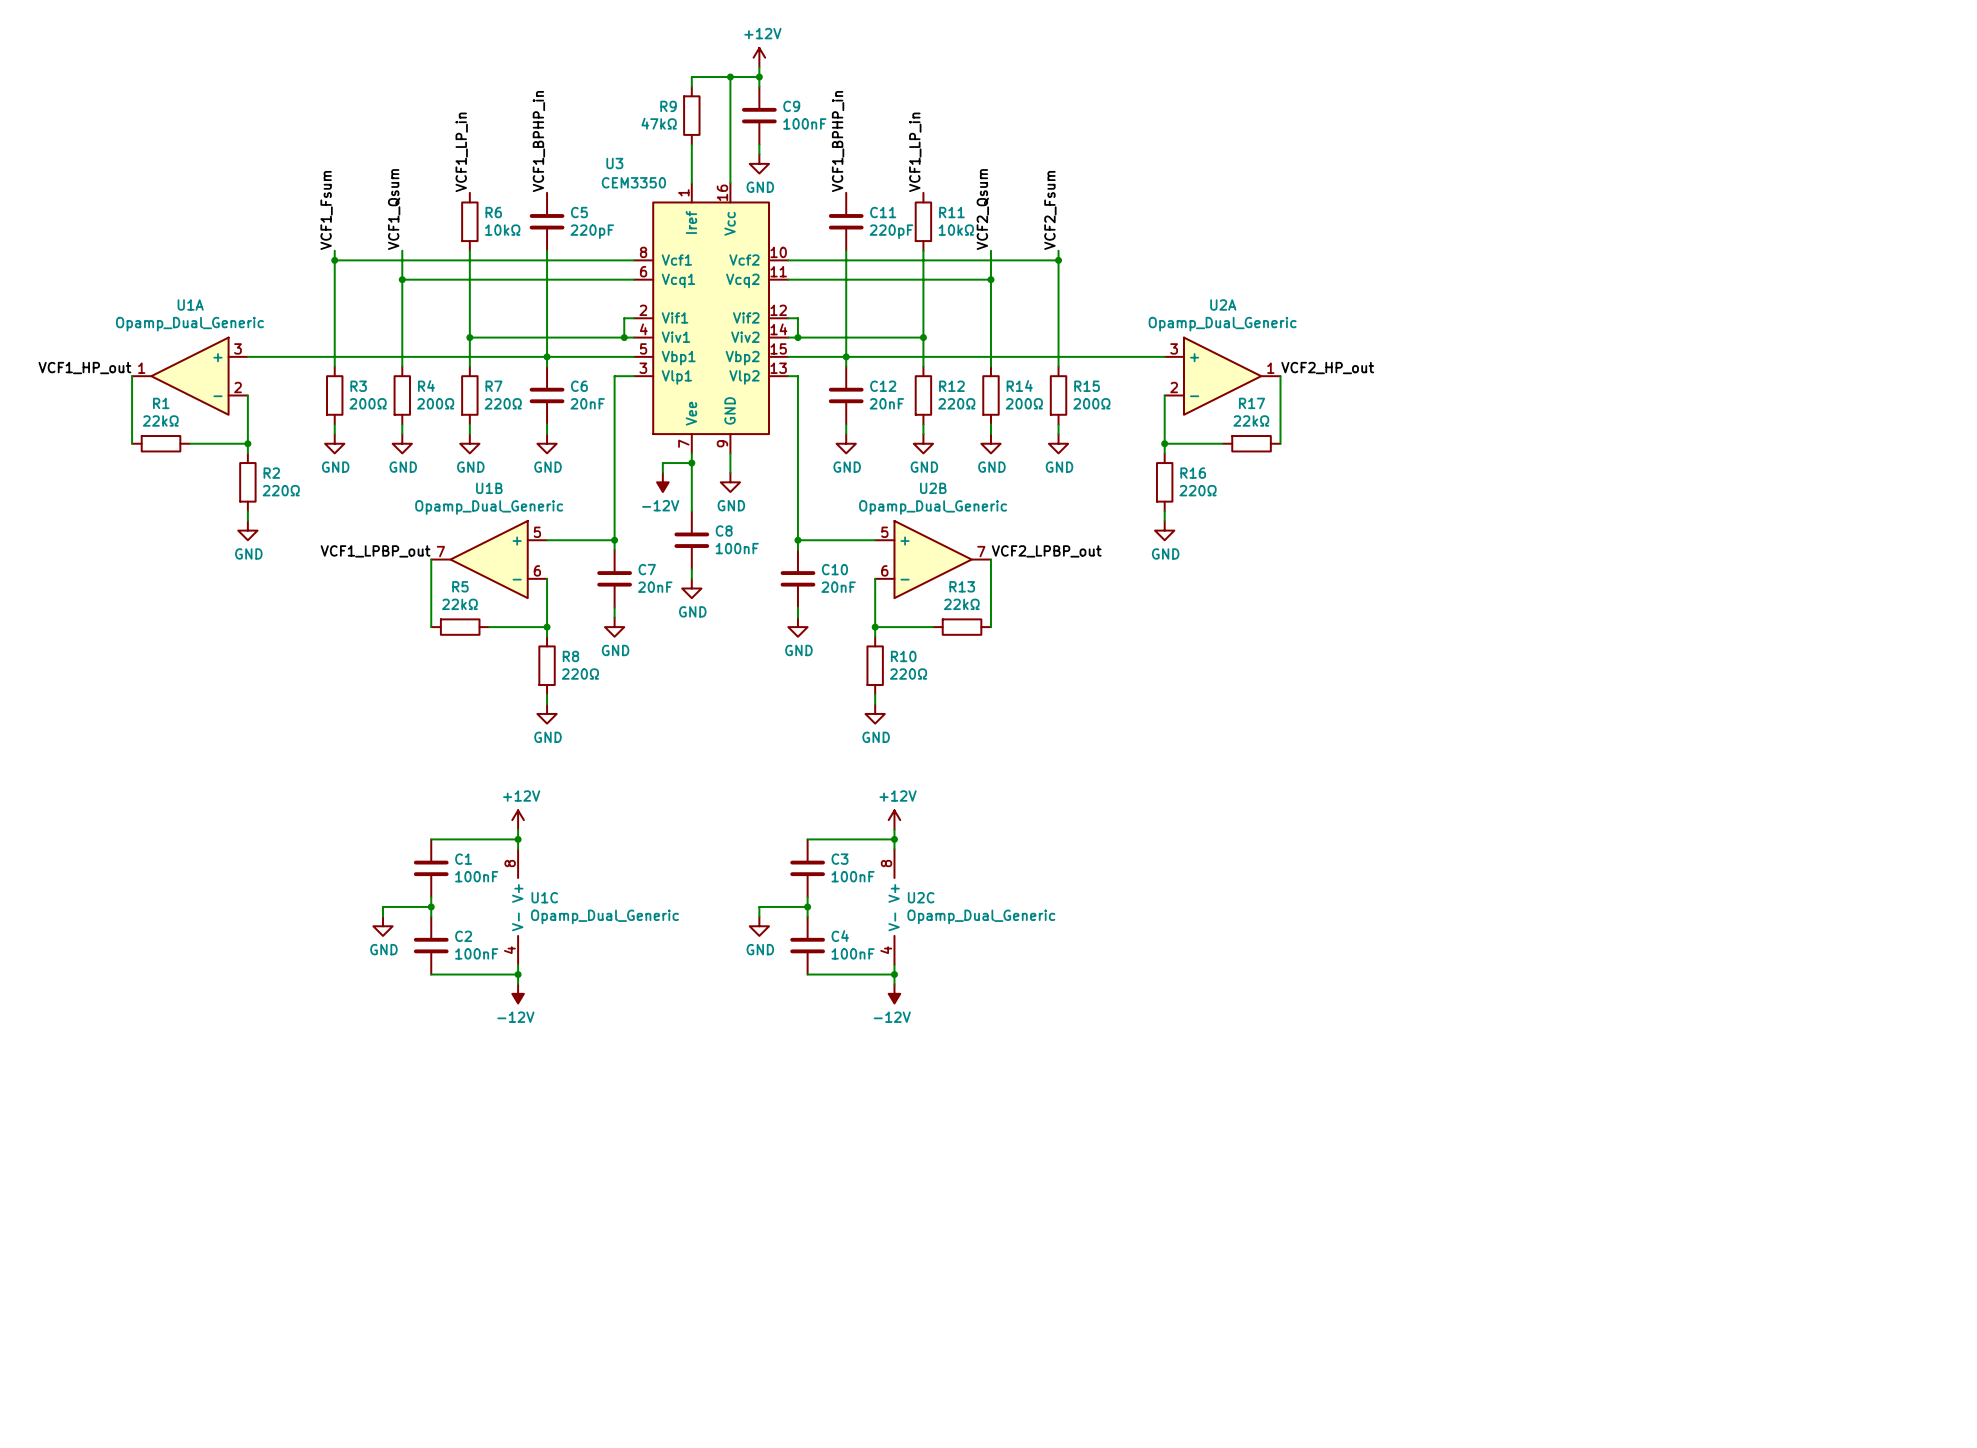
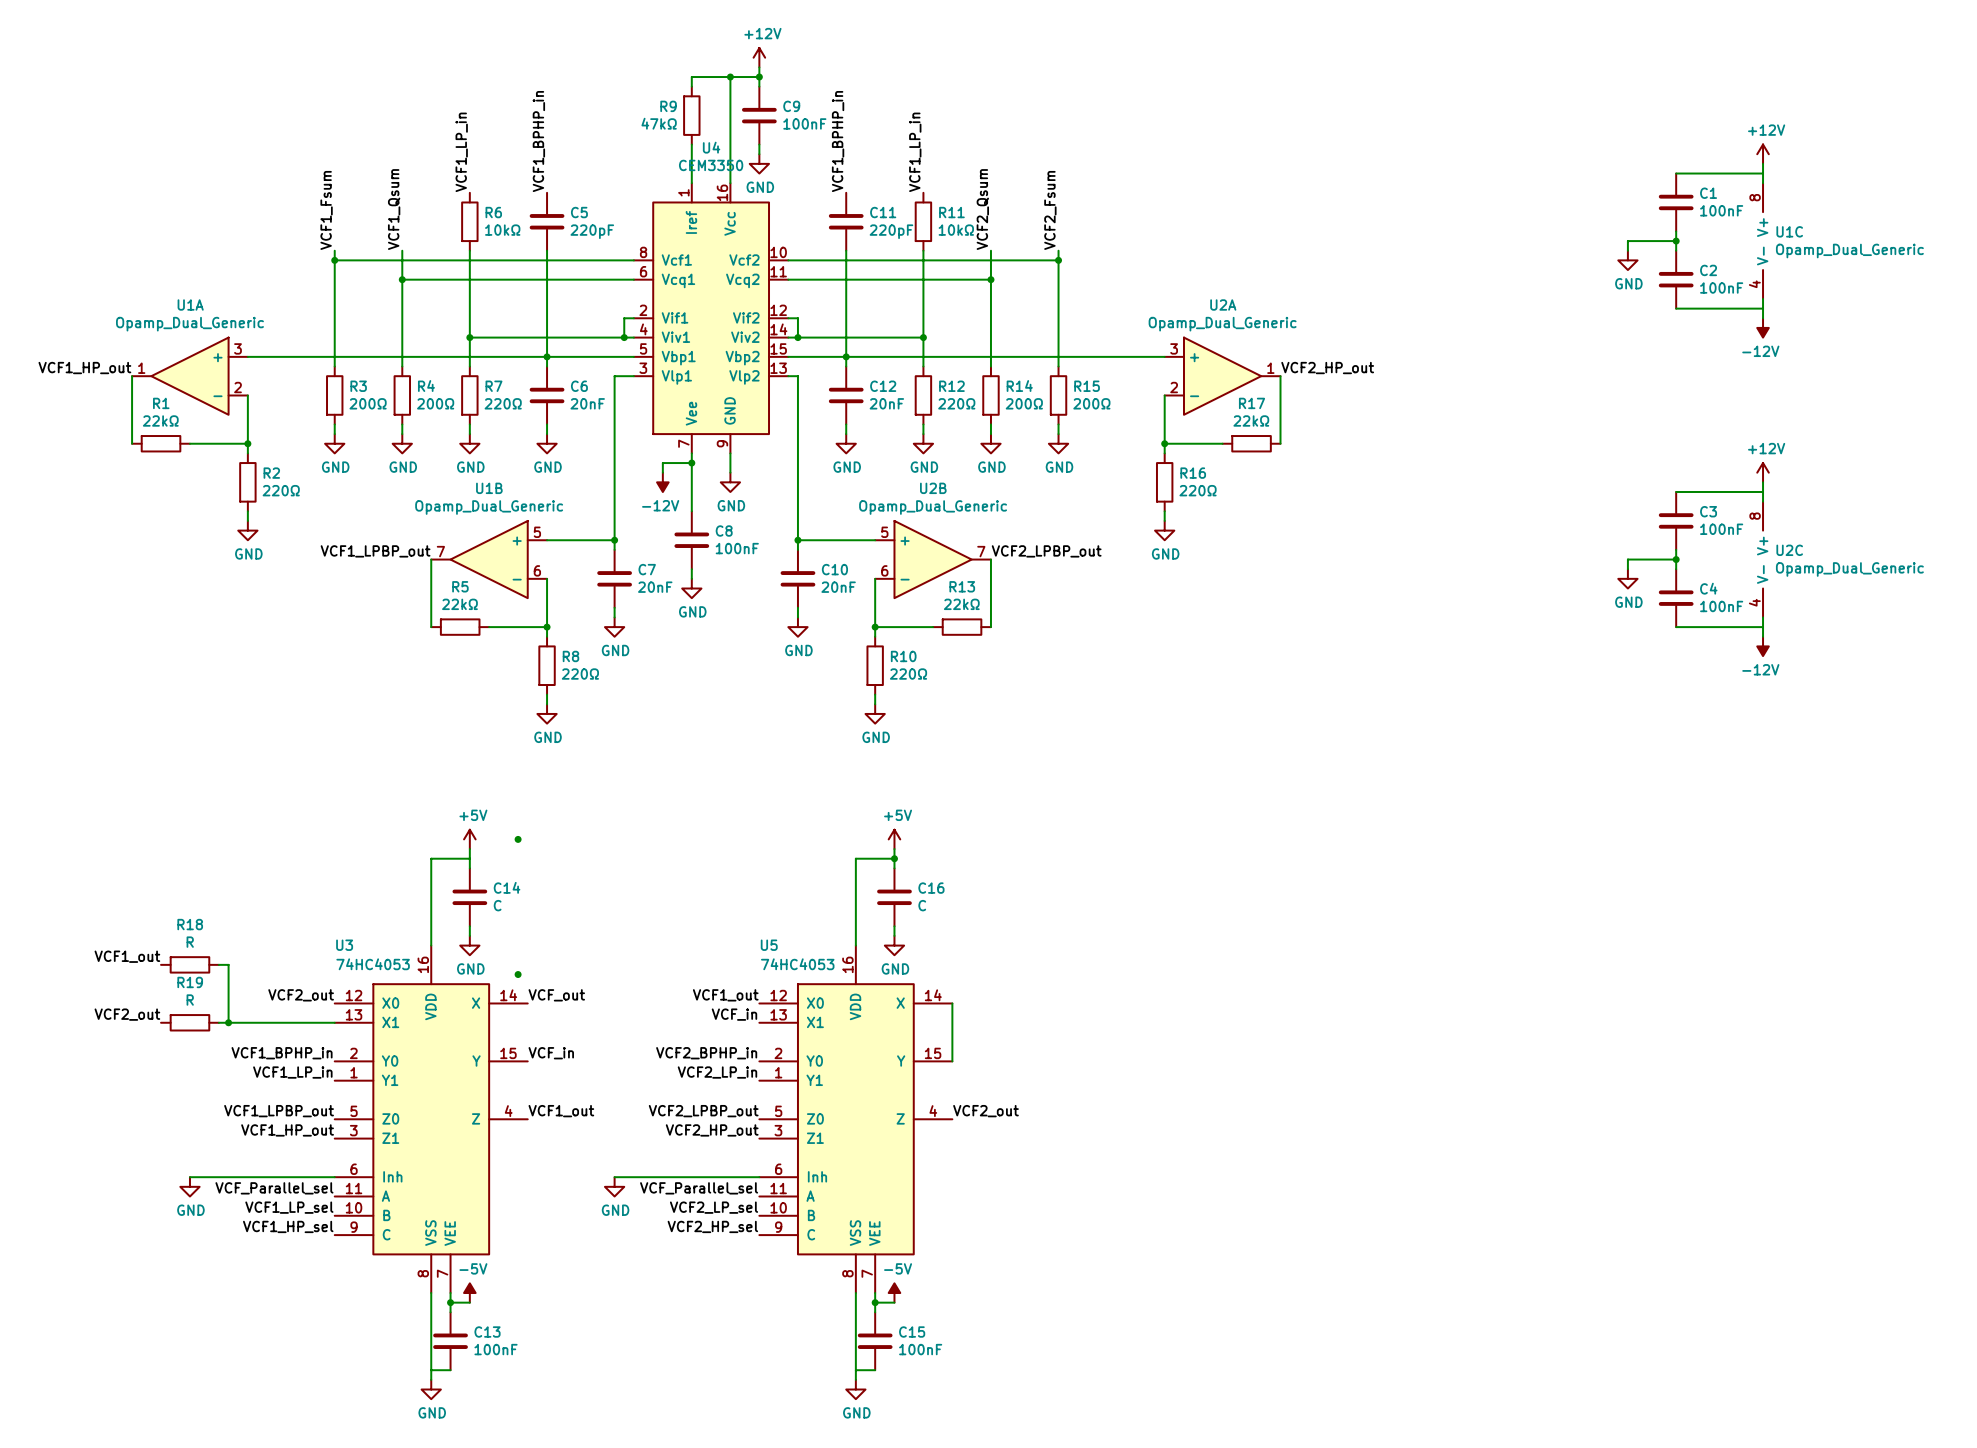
power symbol: none -> +12V (1763, 154)
U3 name: U3 (614, 163) -> U4 (711, 147)
wire: none -> (1763, 163) (1763, 183)
wire: none -> (1676, 173) (1763, 173)
U3 value position: CEM3350 (633, 182) -> CEM3350 (711, 165)
wire: none -> (1676, 231) (1676, 250)
wire: none -> (1676, 241) (1627, 241) (1627, 250)
junction: none -> (1676, 241)
power symbol: none -> GND (1627, 260)
wire: none -> (1763, 298) (1763, 318)
wire: none -> (1676, 308) (1763, 308)
power symbol: none -> -12V (1763, 327)
power symbol: none -> +12V (1763, 472)
wire: none -> (1763, 482) (1763, 501)
wire: none -> (1676, 491) (1763, 491)
wire: none -> (1676, 549) (1676, 569)
wire: none -> (1676, 559) (1627, 559) (1627, 569)
junction: none -> (1676, 559)
power symbol: none -> GND (1627, 578)
wire: none -> (1763, 617) (1763, 636)
wire: none -> (1676, 627) (1763, 627)
power symbol: none -> -12V (1763, 646)
power symbol: +12V (518, 820) -> none
power symbol: +12V (894, 820) -> none
wire: (518, 829) (518, 849) -> (469, 849) (469, 868)
wire: (431, 839) (518, 839) -> none
power symbol: none -> +5V (469, 839)
wire: (807, 839) (894, 839) -> none
power symbol: none -> +5V (894, 839)
junction position: (894, 839) -> (894, 858)
wire: none -> (469, 858) (431, 858) (431, 897)
wire: none -> (894, 858) (855, 858) (855, 945)
C1 position: (431, 868) -> (1676, 202)
C3 position: (807, 868) -> (1676, 520)
C14: none -> C (469, 897)
wire: (807, 897) (807, 916) -> none
C16: none -> C (894, 897)
wire: (431, 906) (382, 906) (382, 916) -> none
junction: (431, 906) -> none
U1C position: (518, 906) -> (1763, 241)
wire: (807, 906) (759, 906) (759, 916) -> none
junction: (807, 906) -> none
U2C position: (894, 906) -> (1763, 559)
power symbol position: GND (382, 926) -> GND (469, 945)
wire: none -> (469, 926) (469, 935)
power symbol position: GND (759, 926) -> GND (894, 945)
wire: none -> (894, 926) (894, 935)
C2 position: (431, 945) -> (1676, 279)
C4 position: (807, 945) -> (1676, 598)
label: none -> VCF1_out (127, 956)
R18: none -> R (189, 964)
wire: none -> (218, 964) (228, 964) (228, 1022)
wire: (518, 964) (518, 984) -> none
wire: (894, 964) (894, 984) -> none
wire: (431, 974) (518, 974) -> none
wire: (807, 974) (894, 974) -> none
junction: (894, 974) -> none
power symbol: -12V (518, 993) -> none
power symbol: -12V (894, 993) -> none
label: none -> VCF2_out (301, 995)
label: none -> VCF_out (556, 995)
label: none -> VCF1_out (725, 995)
wire: none -> (952, 1003) (952, 1061)
label: none -> VCF2_out (127, 1014)
label: none -> VCF_in (734, 1014)
R19: none -> R (189, 1022)
wire: none -> (218, 1022) (334, 1022)
junction: none -> (228, 1022)
label: none -> VCF1_BPHP_in (282, 1053)
label: none -> VCF_in (551, 1053)
label: none -> VCF2_BPHP_in (706, 1053)
label: none -> VCF1_LP_in (292, 1072)
label: none -> VCF2_LP_in (717, 1072)
label: none -> VCF1_LPBP_out (279, 1111)
label: none -> VCF1_out (561, 1111)
label: none -> VCF2_LPBP_out (703, 1111)
label: none -> VCF2_out (985, 1111)
U3: none -> 74HC4053 (431, 1119)
U5: none -> 74HC4053 (855, 1119)
label: none -> VCF1_HP_out (287, 1130)
label: none -> VCF2_HP_out (712, 1130)
wire: none -> (189, 1177) (334, 1177)
wire: none -> (614, 1177) (759, 1177)
power symbol: none -> GND (189, 1186)
power symbol: none -> GND (614, 1186)
label: none -> VCF_Parallel_sel (274, 1188)
label: none -> VCF_Parallel_sel (699, 1188)
label: none -> VCF1_LP_sel (289, 1207)
label: none -> VCF2_LP_sel (714, 1207)
label: none -> VCF1_HP_sel (288, 1226)
label: none -> VCF2_HP_sel (712, 1226)
wire: none -> (431, 1292) (431, 1379)
wire: none -> (450, 1292) (450, 1312)
power symbol: none -> -5V (469, 1292)
wire: none -> (855, 1292) (855, 1379)
wire: none -> (875, 1292) (875, 1312)
power symbol: none -> -5V (894, 1292)
wire: none -> (450, 1302) (469, 1302)
junction: none -> (450, 1302)
wire: none -> (875, 1302) (894, 1302)
junction: none -> (875, 1302)
C13: none -> 100nF (450, 1341)
C15: none -> 100nF (875, 1341)
wire: none -> (431, 1370) (450, 1370)
wire: none -> (855, 1370) (875, 1370)
power symbol: none -> GND (431, 1389)
power symbol: none -> GND (855, 1389)

